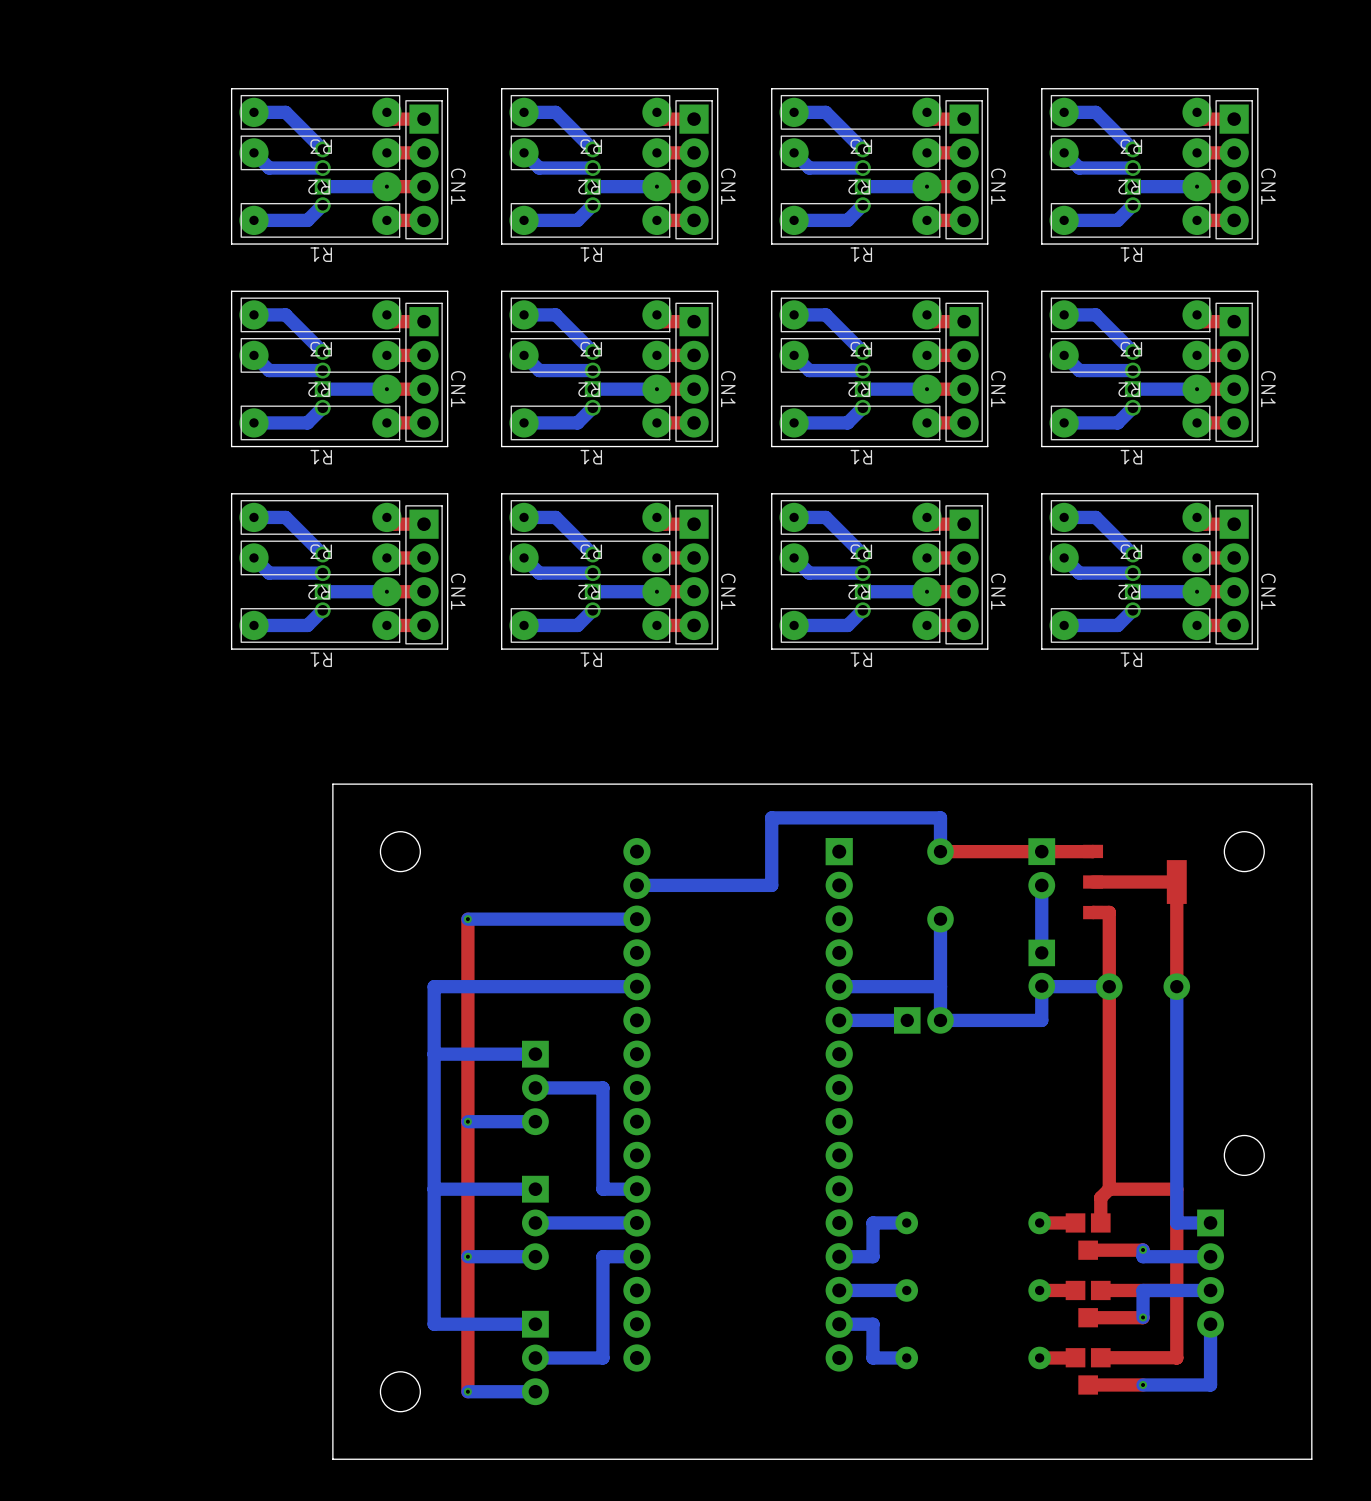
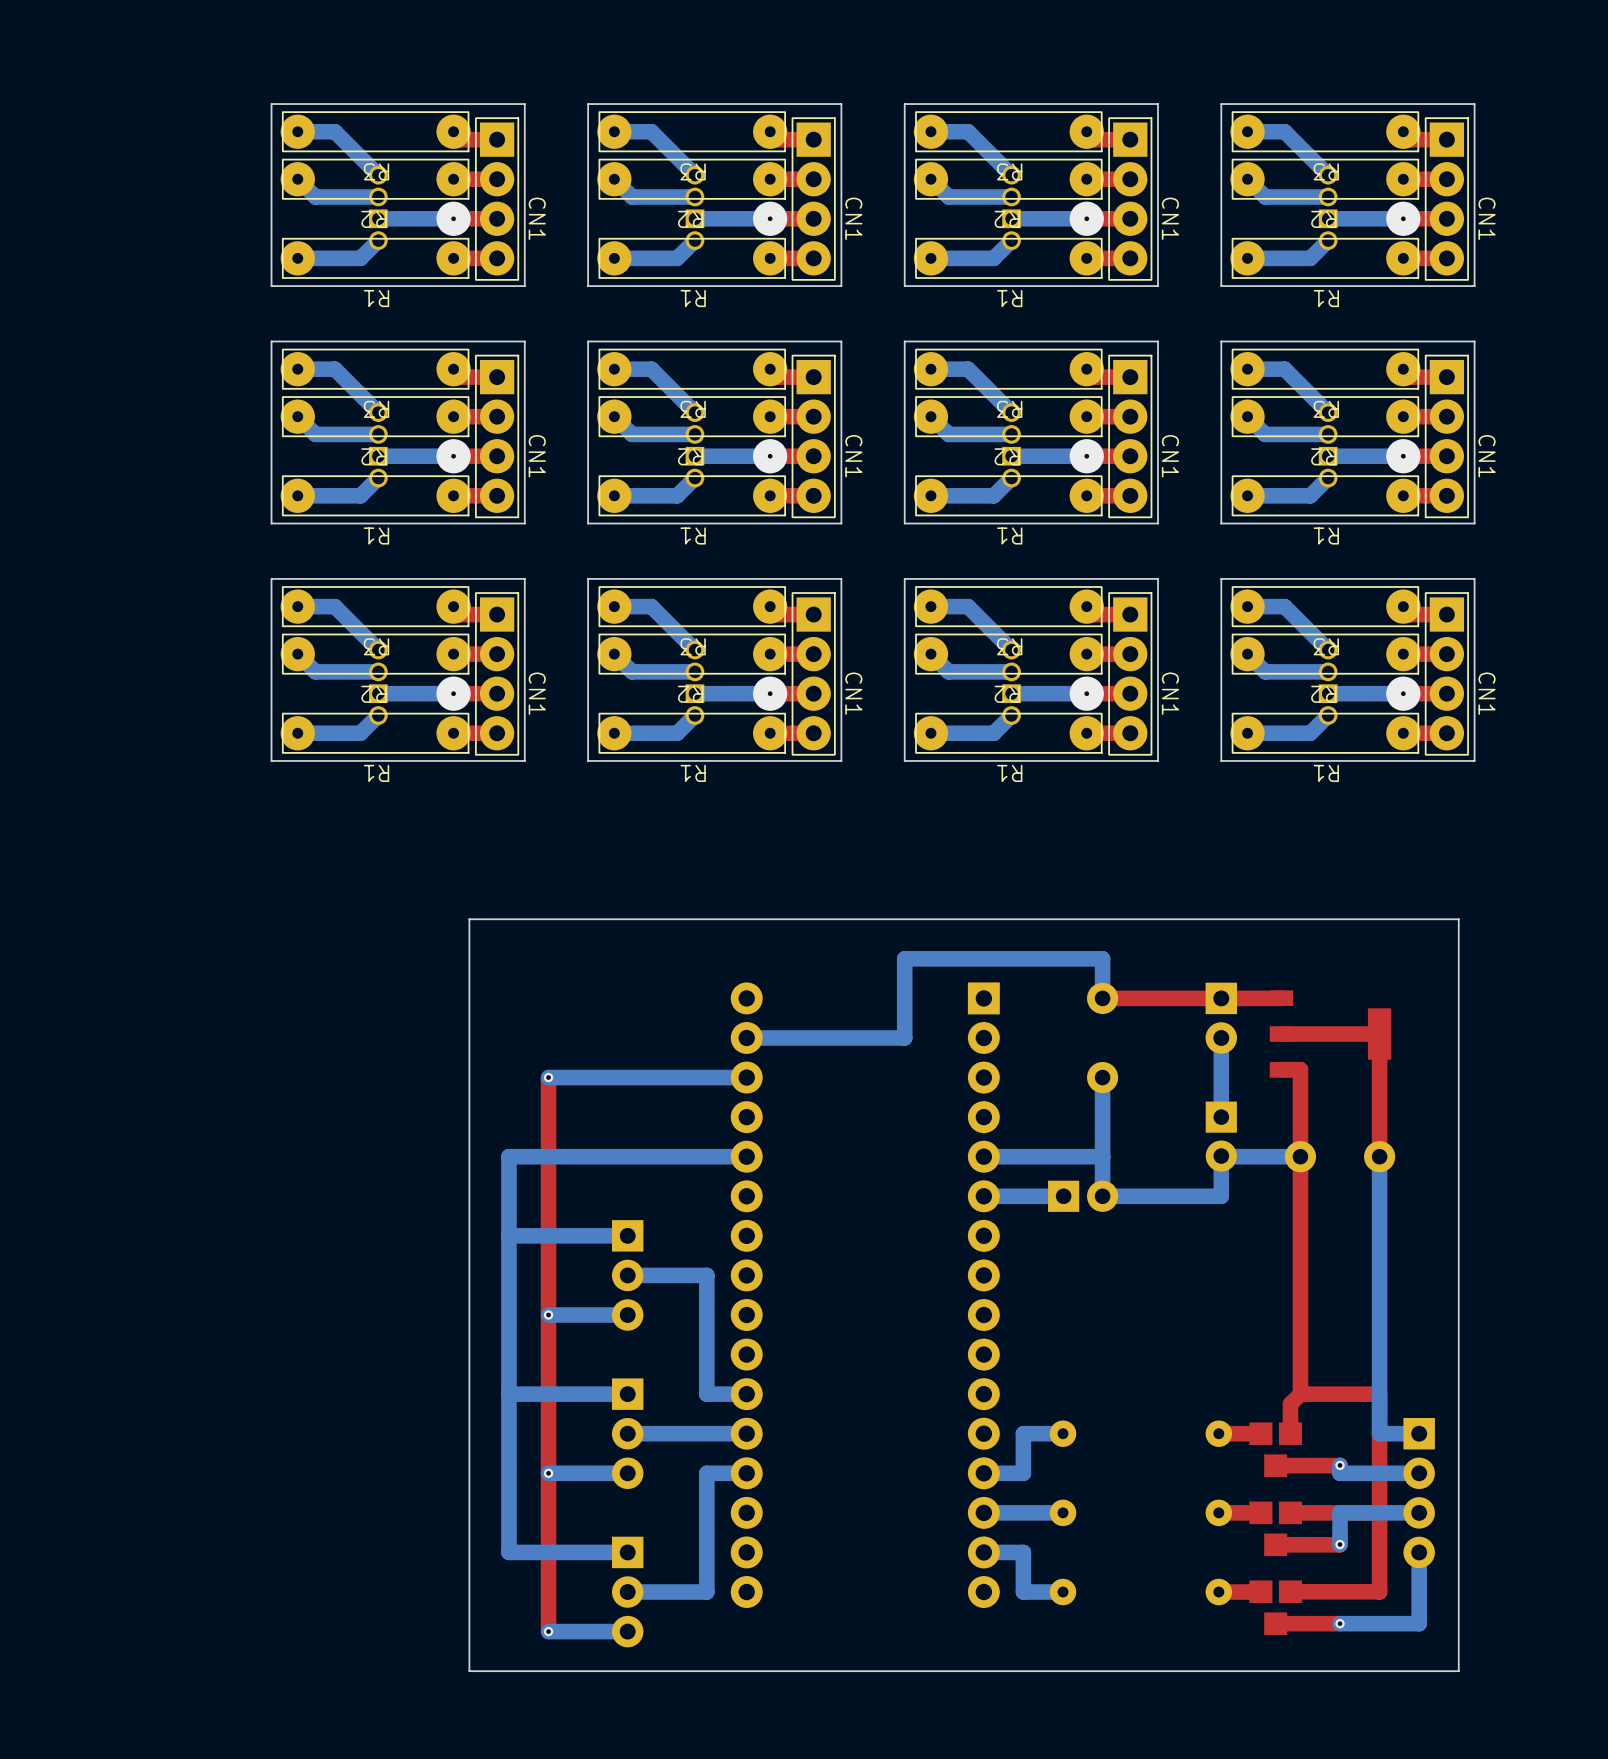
board edge: (1244, 784) (1311, 784) (1311, 1459) (332, 1459) (332, 784) (400, 784) -> (1458, 919) (1458, 1671) (469, 1671) (469, 919)
round board edge: [380, 831, 421, 872] -> none
round board edge: [1224, 831, 1265, 872] -> none
round board edge: [1224, 1135, 1265, 1176] -> none
round board edge: [380, 1371, 421, 1413] -> none

